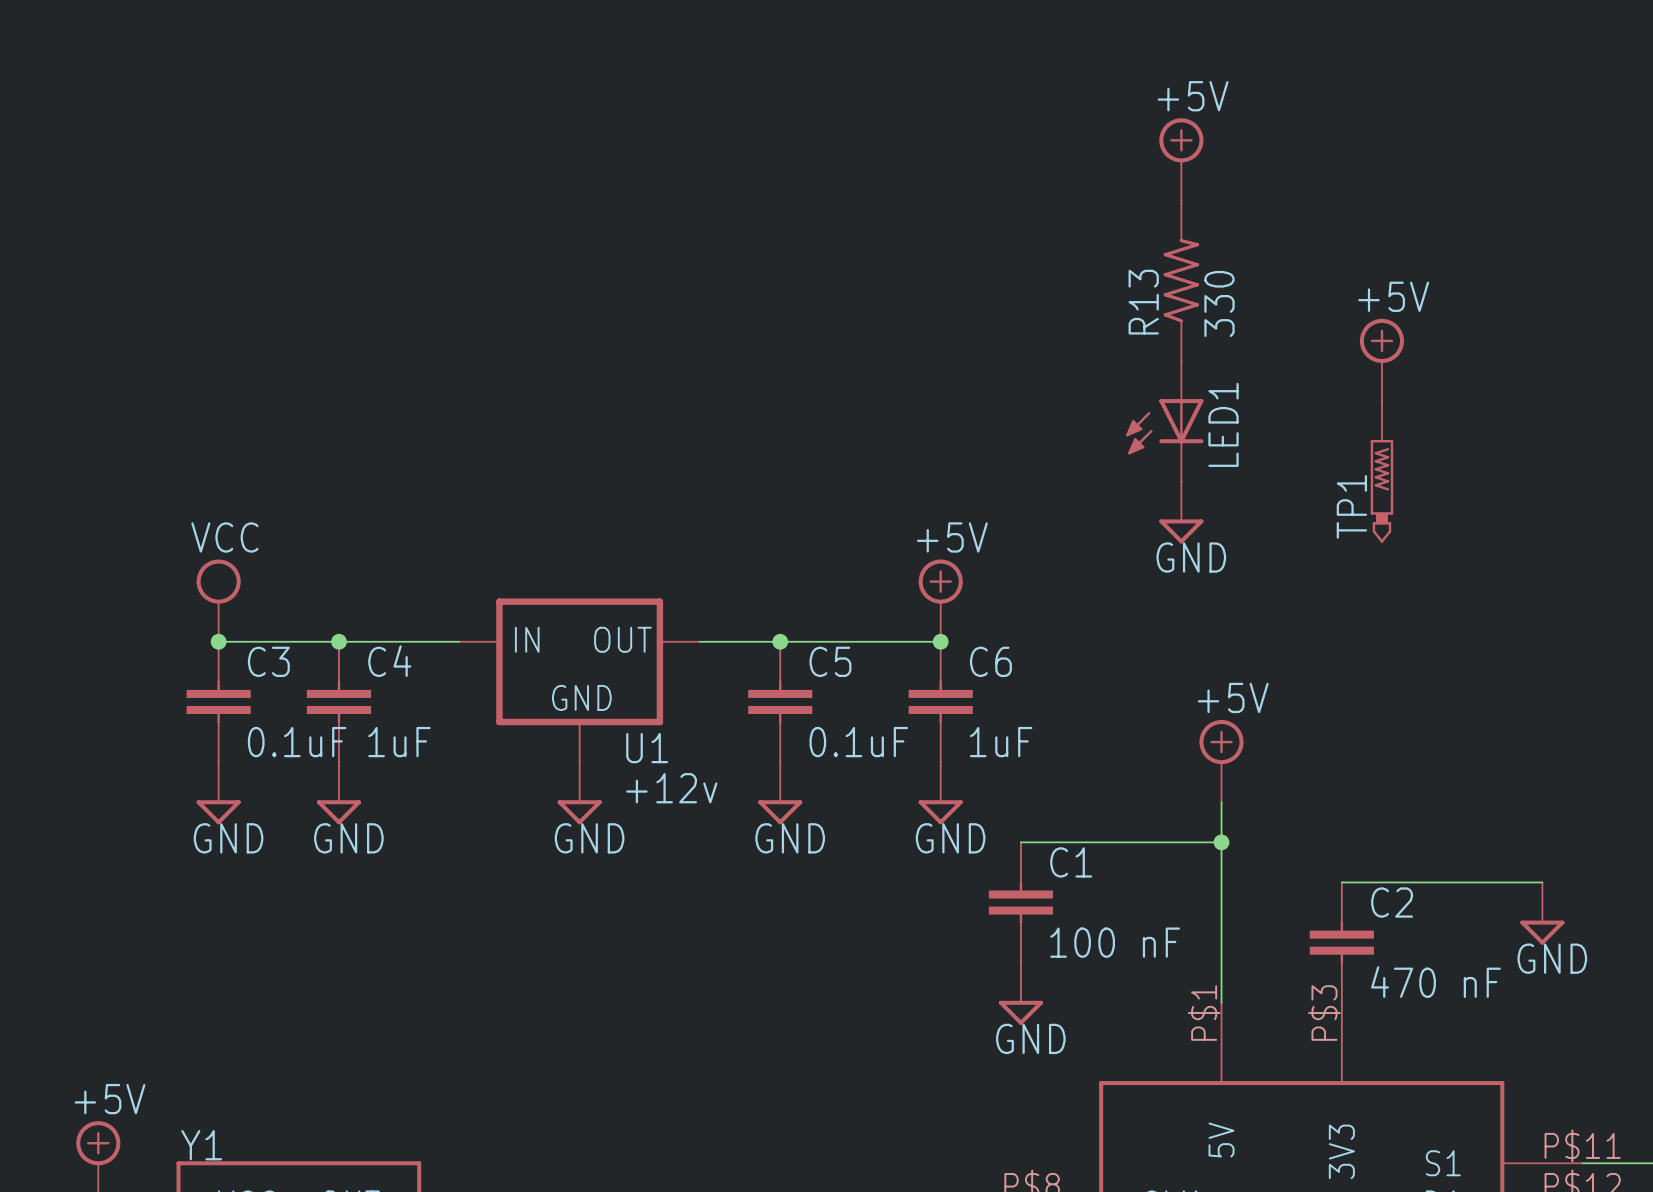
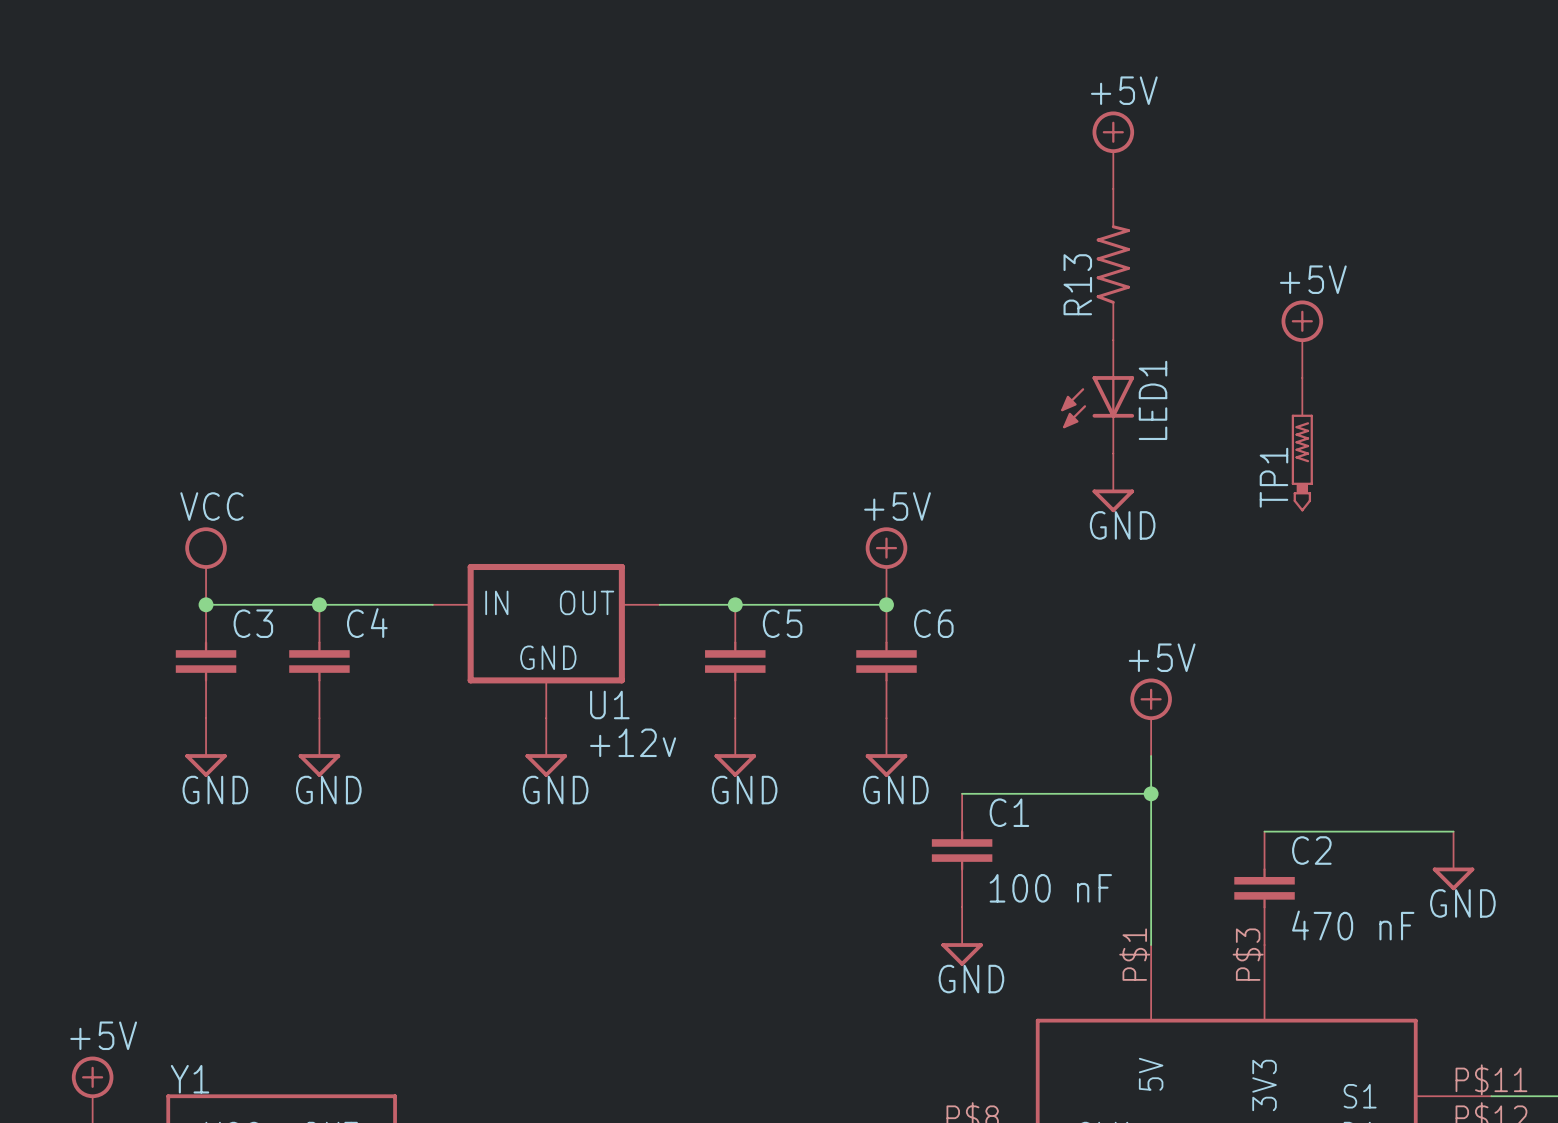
R13 value: 330 (1219, 303) -> none
C3 value: 0.1uF (297, 742) -> none
C4 value: 1uF (399, 742) -> none
C5 value: 0.1uF (858, 742) -> none
C6 value: 1uF (1001, 742) -> none

